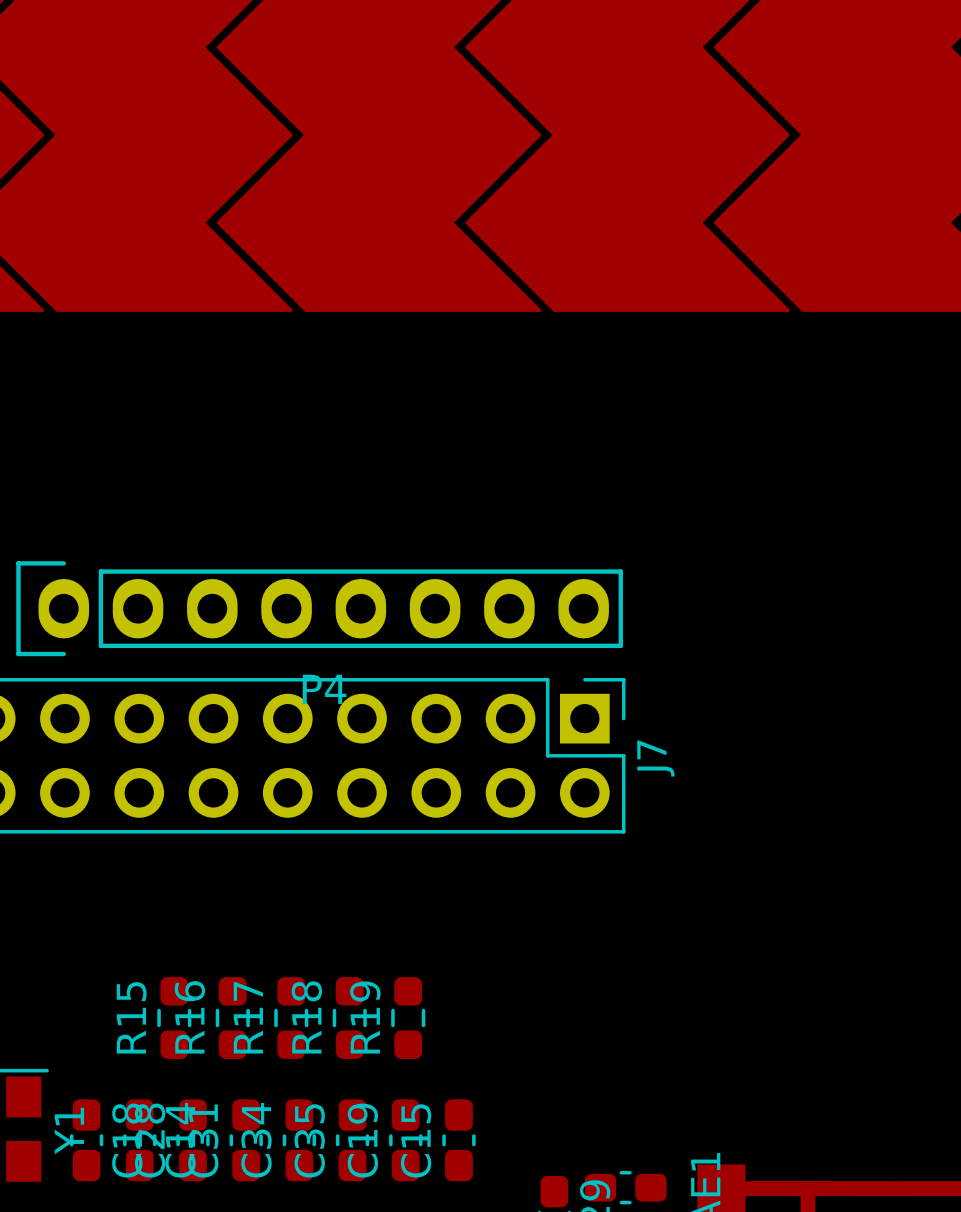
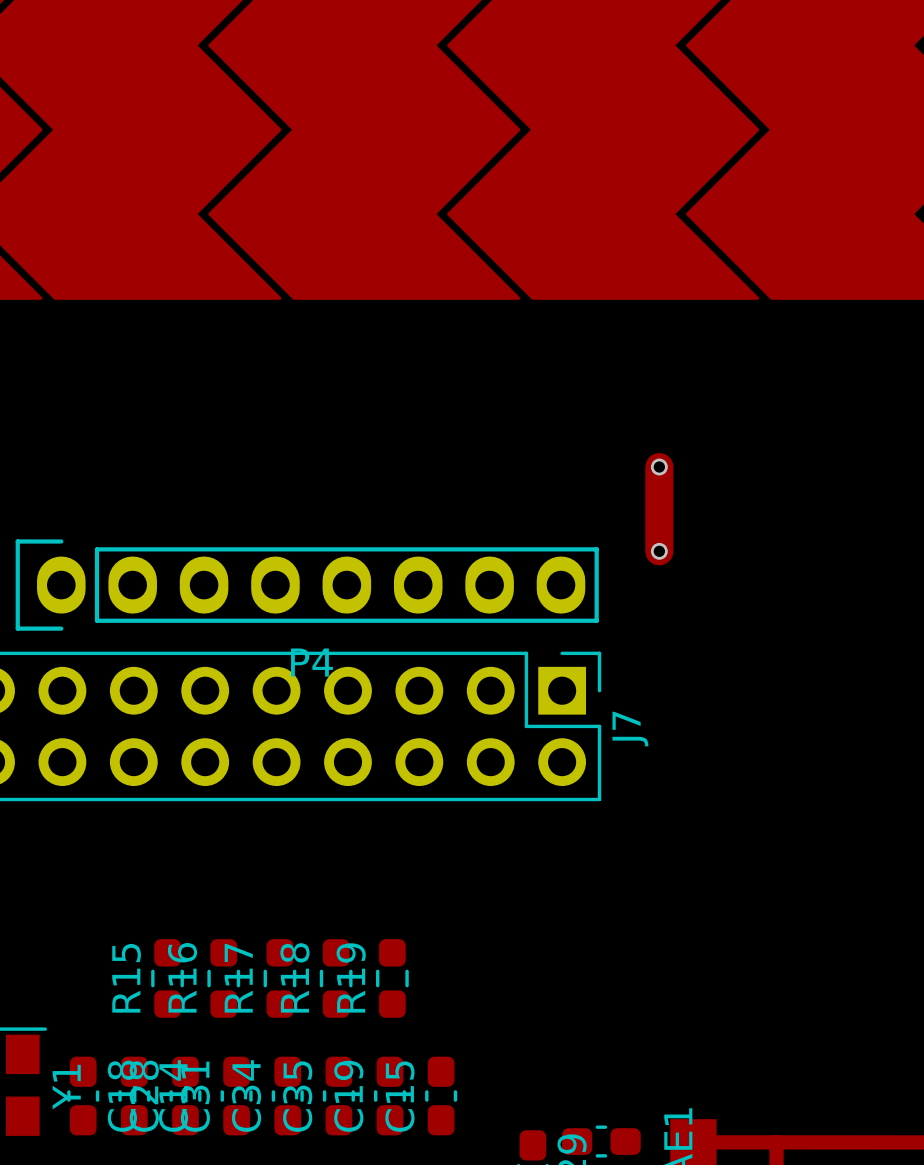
track: none -> (659, 467) (659, 551)
via: none -> (659, 467)
via: none -> (659, 551)

